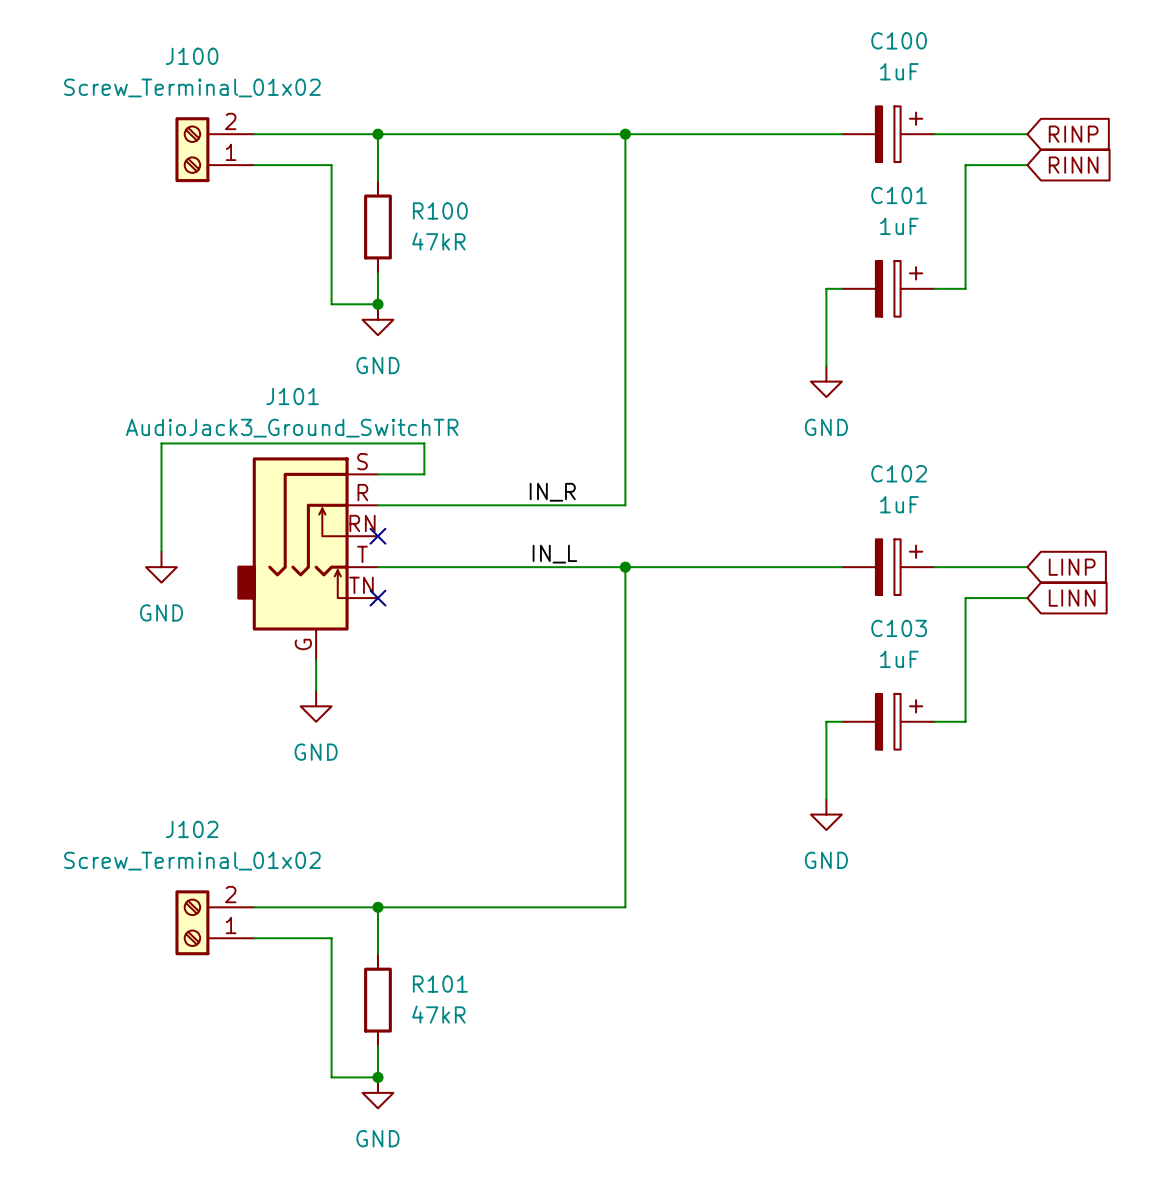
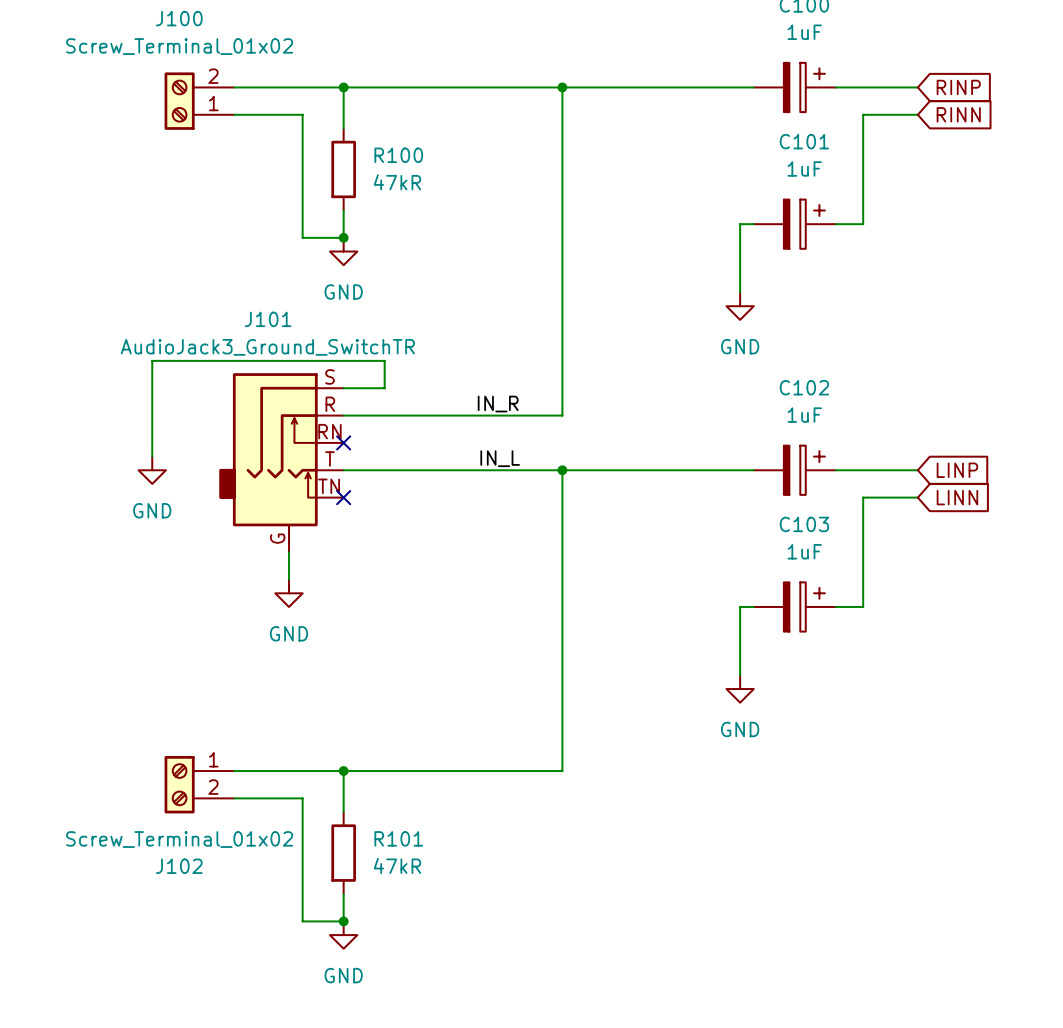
J102 flip: as is (192, 922) -> up-down (179, 784)

